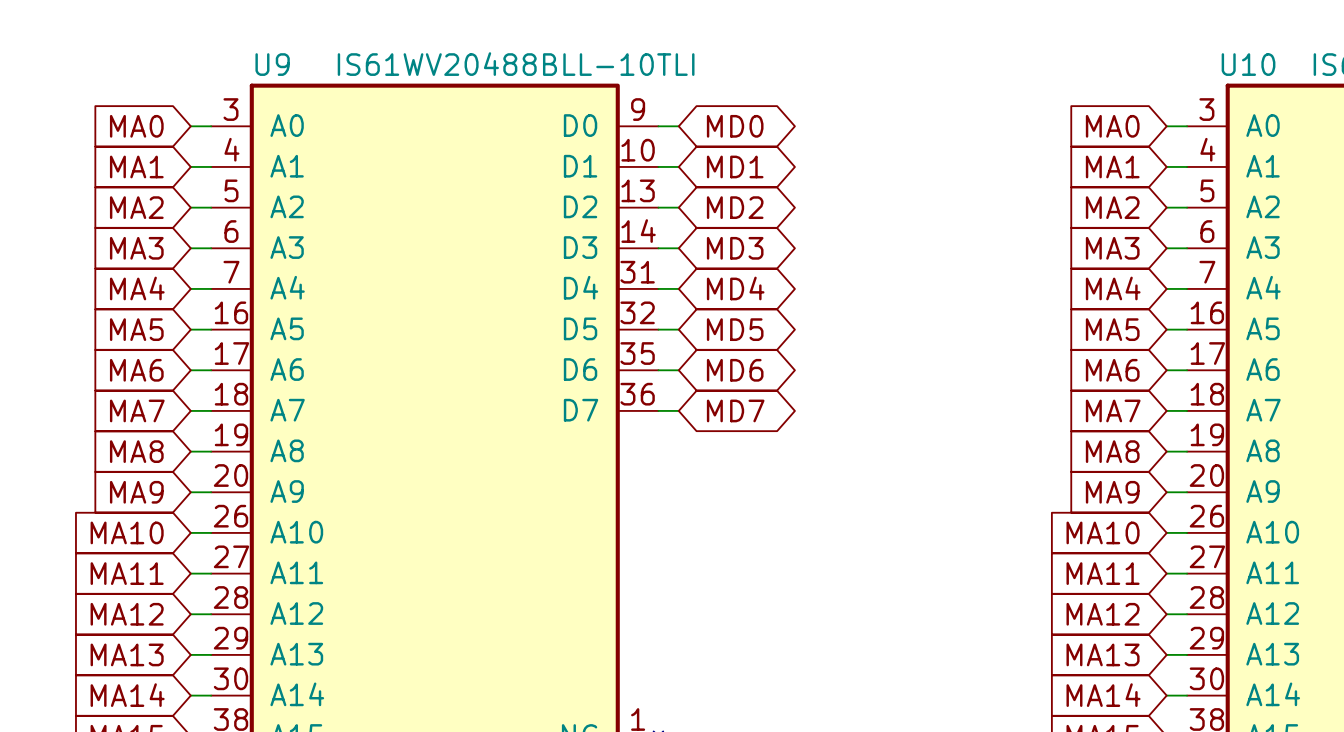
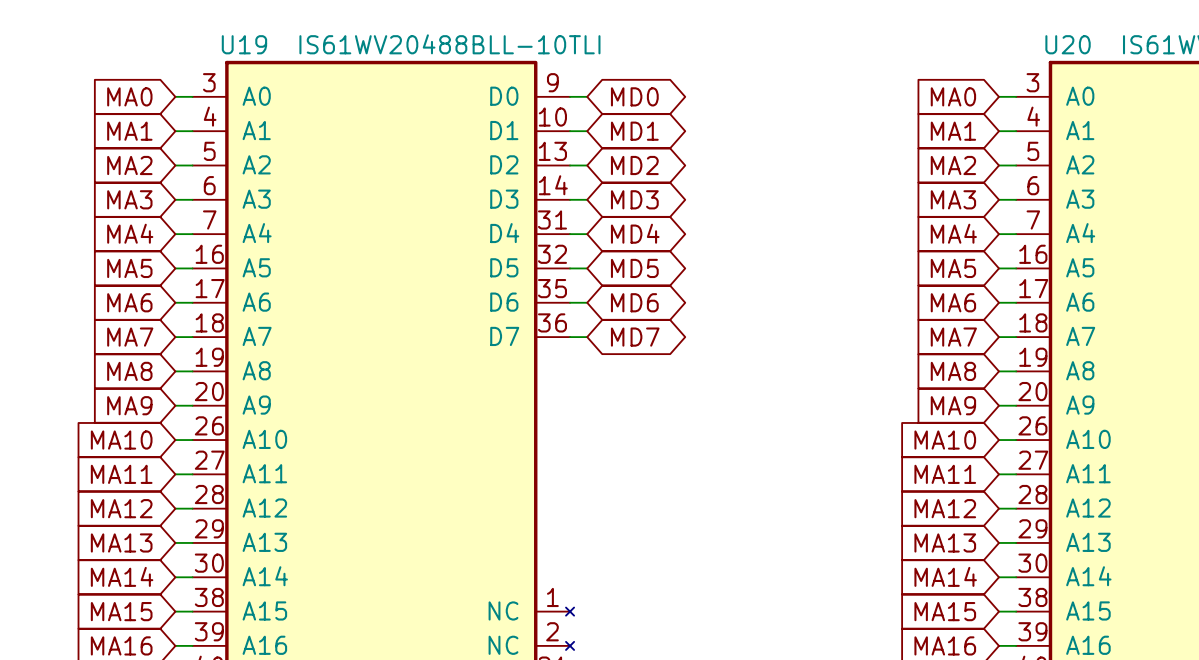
U9 name: U9 (272, 64) -> U19 (244, 44)
U10 name: U10 (1248, 64) -> U20 (1068, 44)

